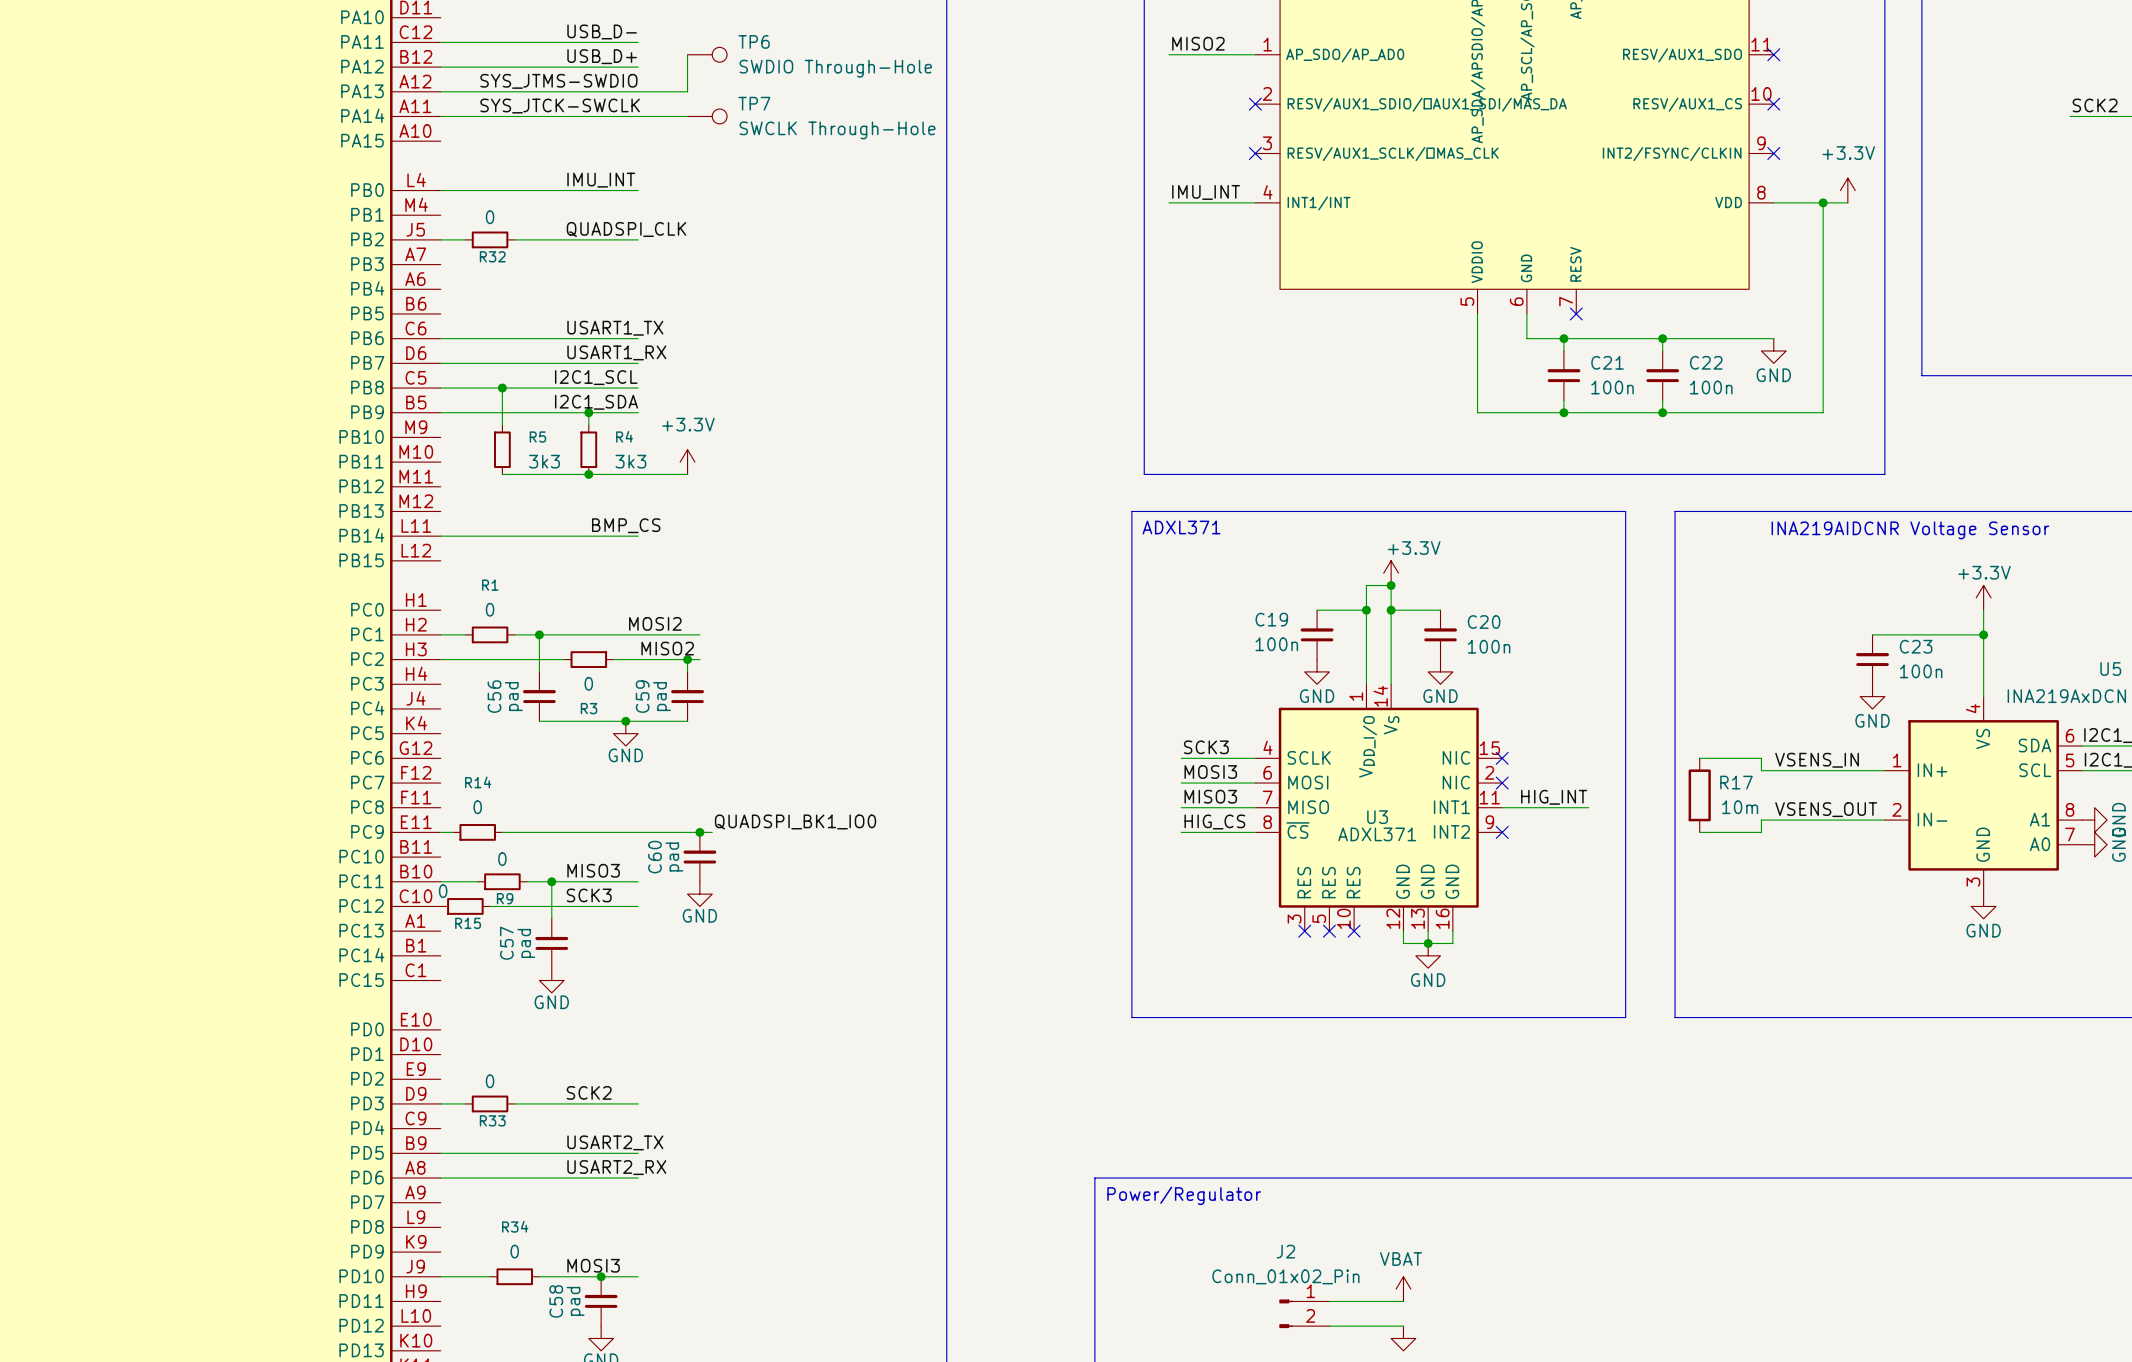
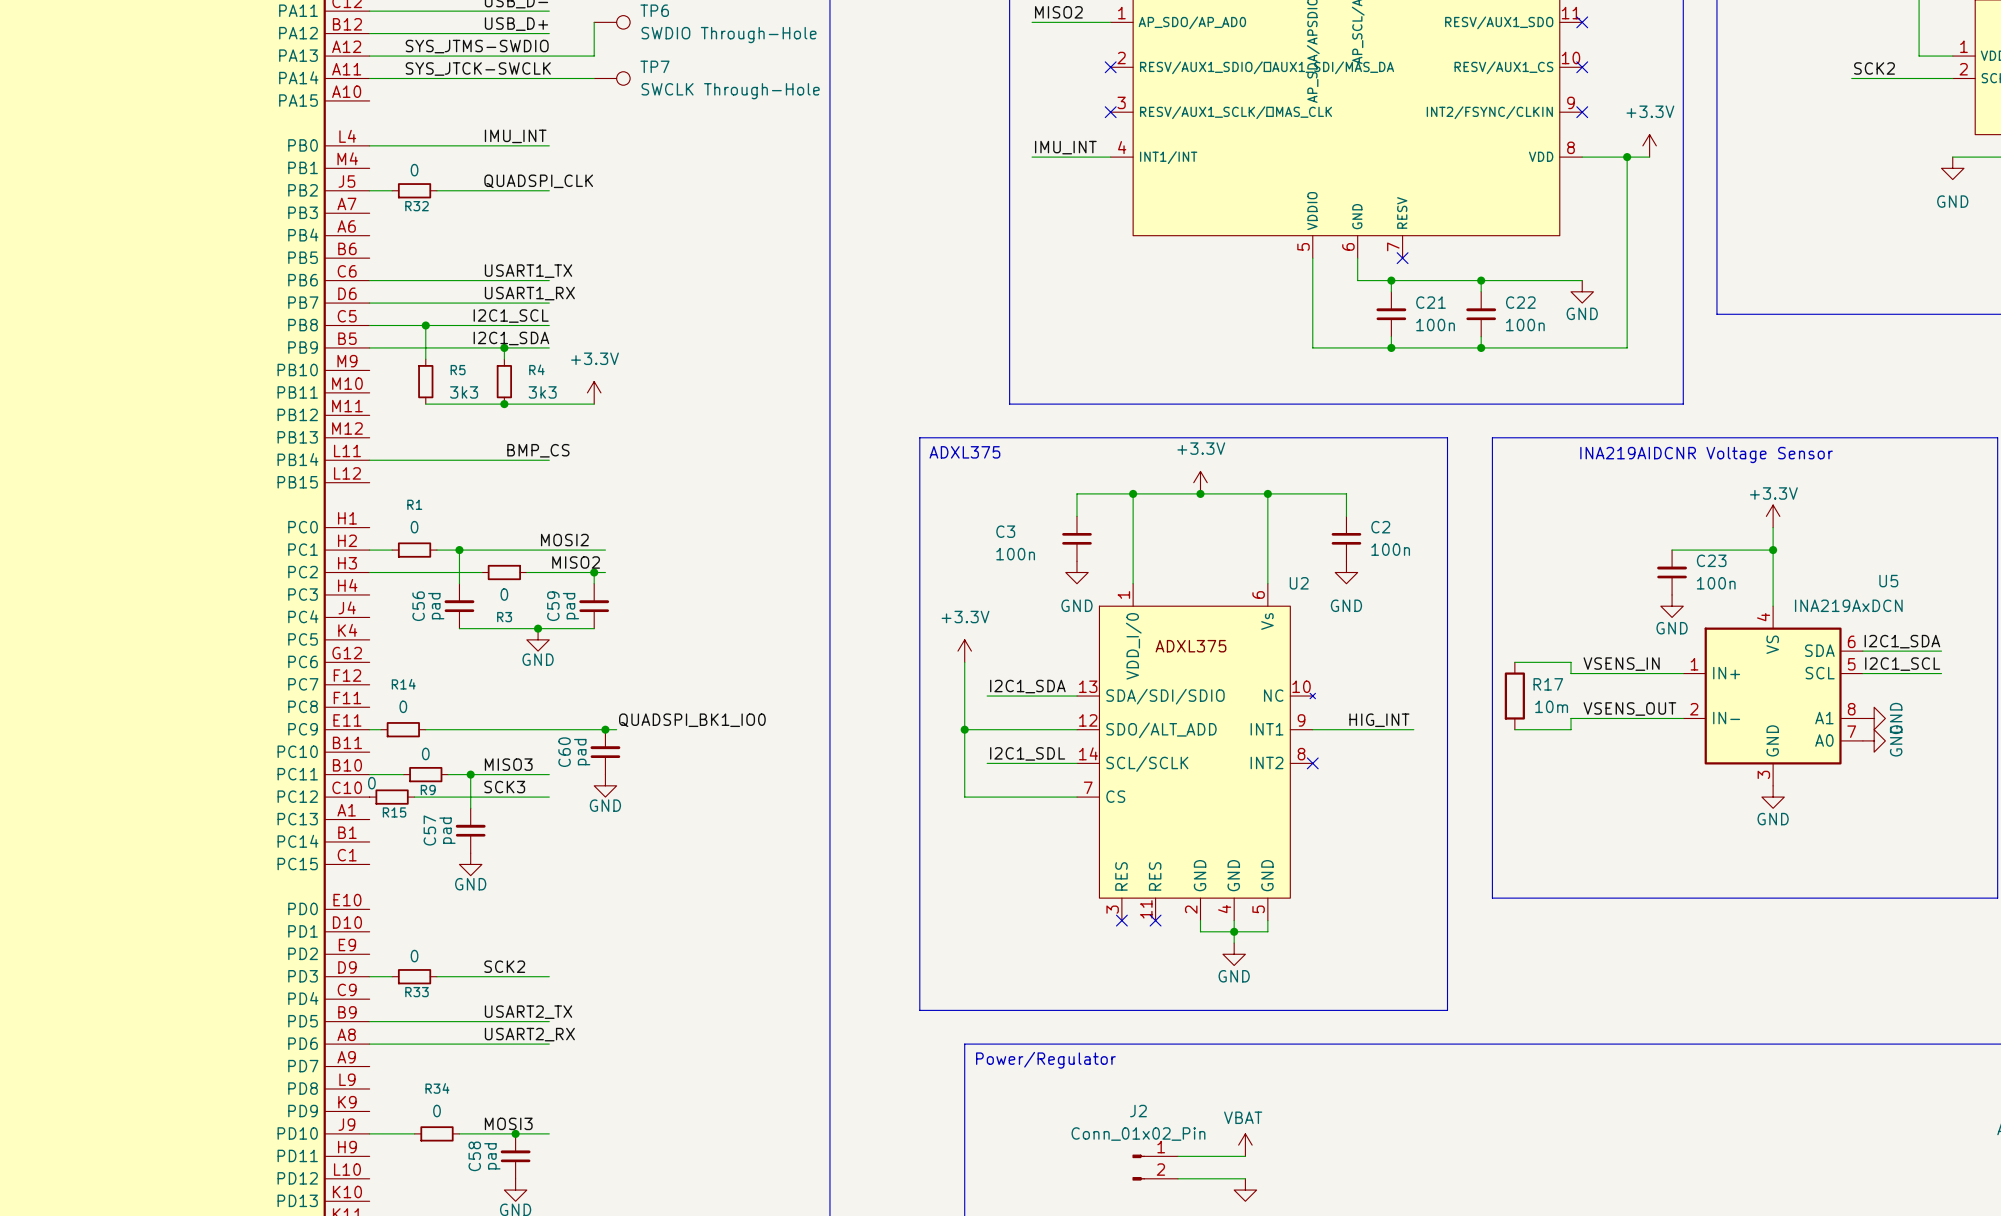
line: (1131, 511) (1131, 1017) (1625, 1017) -> (998, 437) (919, 437) (919, 1010) (1447, 1010) (1447, 898)
text: ADXL371 (1181, 527) -> ADXL375 (964, 452)
power symbol text position: +3.3V (1414, 548) -> +3.3V (1201, 448)
wire: none -> (1133, 493) (1133, 583)
junction: none -> (1133, 493)
junction: none -> (1200, 493)
power symbol position: +3.3V (1391, 573) -> +3.3V (1200, 482)
wire: none -> (1267, 493) (1267, 583)
junction: none -> (1267, 493)
junction: (1391, 585) -> none
wire: none -> (1076, 516) (1076, 493) (1346, 493) (1346, 516)
wire: (1317, 610) (1366, 610) -> none
junction: (1366, 610) -> none
wire: (1391, 610) (1440, 610) -> none
junction: (1391, 610) -> none
C3: none -> 100n (1076, 538)
C2: none -> 100n (1346, 538)
C19: 100n (1317, 634) -> none
C20: 100n (1440, 634) -> none
power symbol: none -> GND (1076, 572)
power symbol: GND (1317, 671) -> none
power symbol position: GND (1440, 671) -> GND (1346, 572)
wire: (1366, 684) (1366, 585) (1391, 585) (1391, 684) -> none
power symbol text position: GND (1440, 696) -> GND (1346, 605)
power symbol: none -> +3.3V (964, 651)
label: SCK3 (1206, 747) -> none
wire: none -> (964, 662) (964, 797) (1076, 797)
wire: (1181, 758) (1255, 758) -> none
no-connect mark: (1502, 758) -> none
label: MOSI3 (1210, 772) -> none
wire: (1181, 783) (1255, 783) -> none
no-connect mark: (1502, 783) -> none
label: none -> I2C1_SDA (1027, 686)
wire: none -> (987, 696) (1076, 696)
label: MISO3 (1210, 796) -> none
label position: HIG_INT (1554, 797) -> HIG_INT (1379, 720)
wire: (1181, 807) (1255, 807) -> none
U3: ADXL371 (1378, 807) -> none
wire: (1502, 807) (1588, 807) -> none
label: HIG_CS (1214, 821) -> none
wire: none -> (964, 729) (1043, 729)
junction: none -> (964, 729)
wire: none -> (1312, 729) (1413, 729)
no-connect mark position: (1502, 832) -> (1312, 763)
U2: none -> (1196, 752)
label: none -> I2C1_SDL (1027, 753)
wire: none -> (987, 763) (1076, 763)
no-connect mark: (1304, 931) -> none
no-connect mark: (1329, 931) -> none
no-connect mark: (1354, 931) -> none
junction: (1428, 943) -> none
power symbol position: GND (1428, 955) -> GND (1234, 954)
no-connect mark: none -> (1121, 920)
no-connect mark: none -> (1155, 920)
wire: none -> (1200, 920) (1200, 931) (1267, 931) (1267, 920)
wire: none -> (1234, 920) (1234, 943)
junction: none -> (1234, 931)

